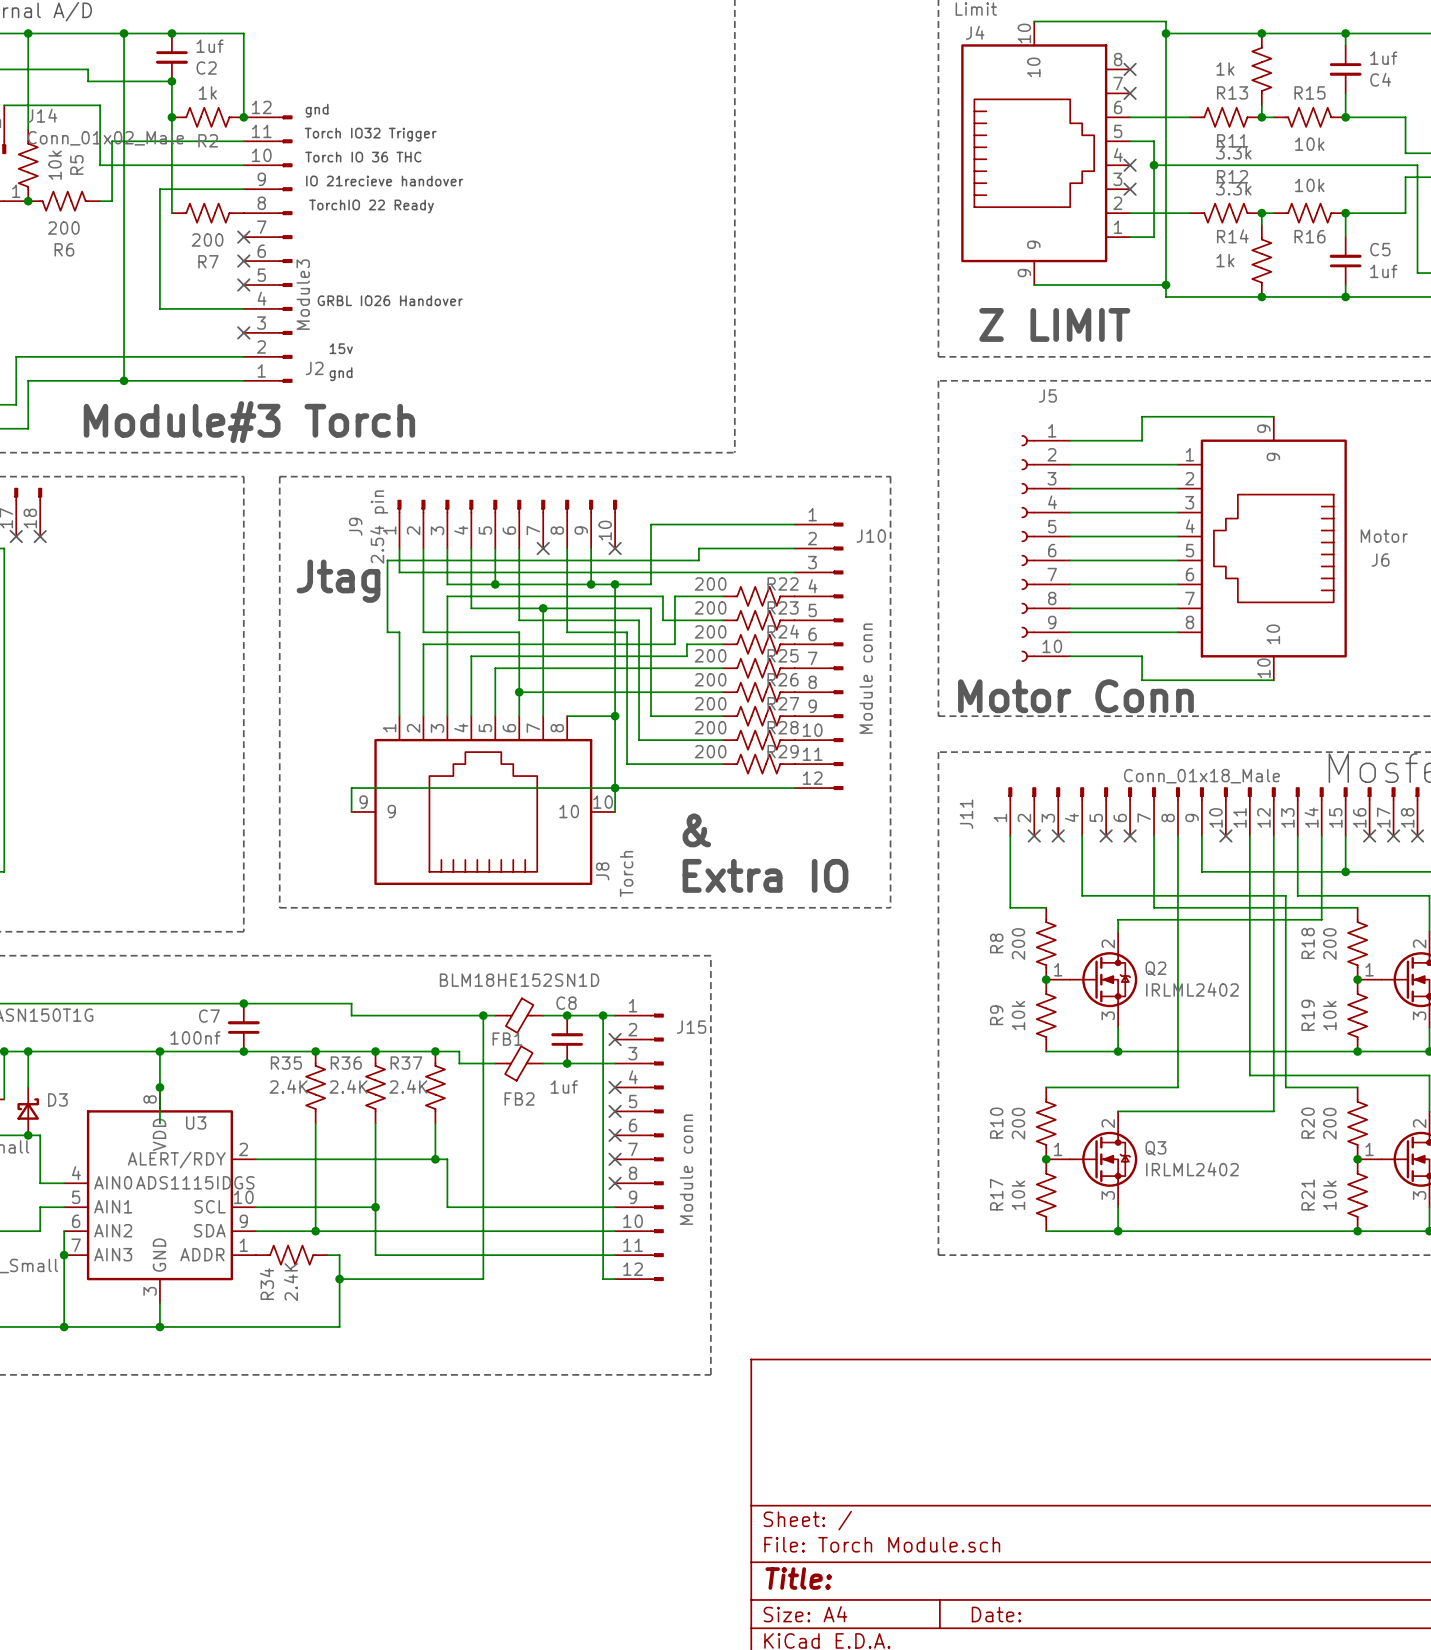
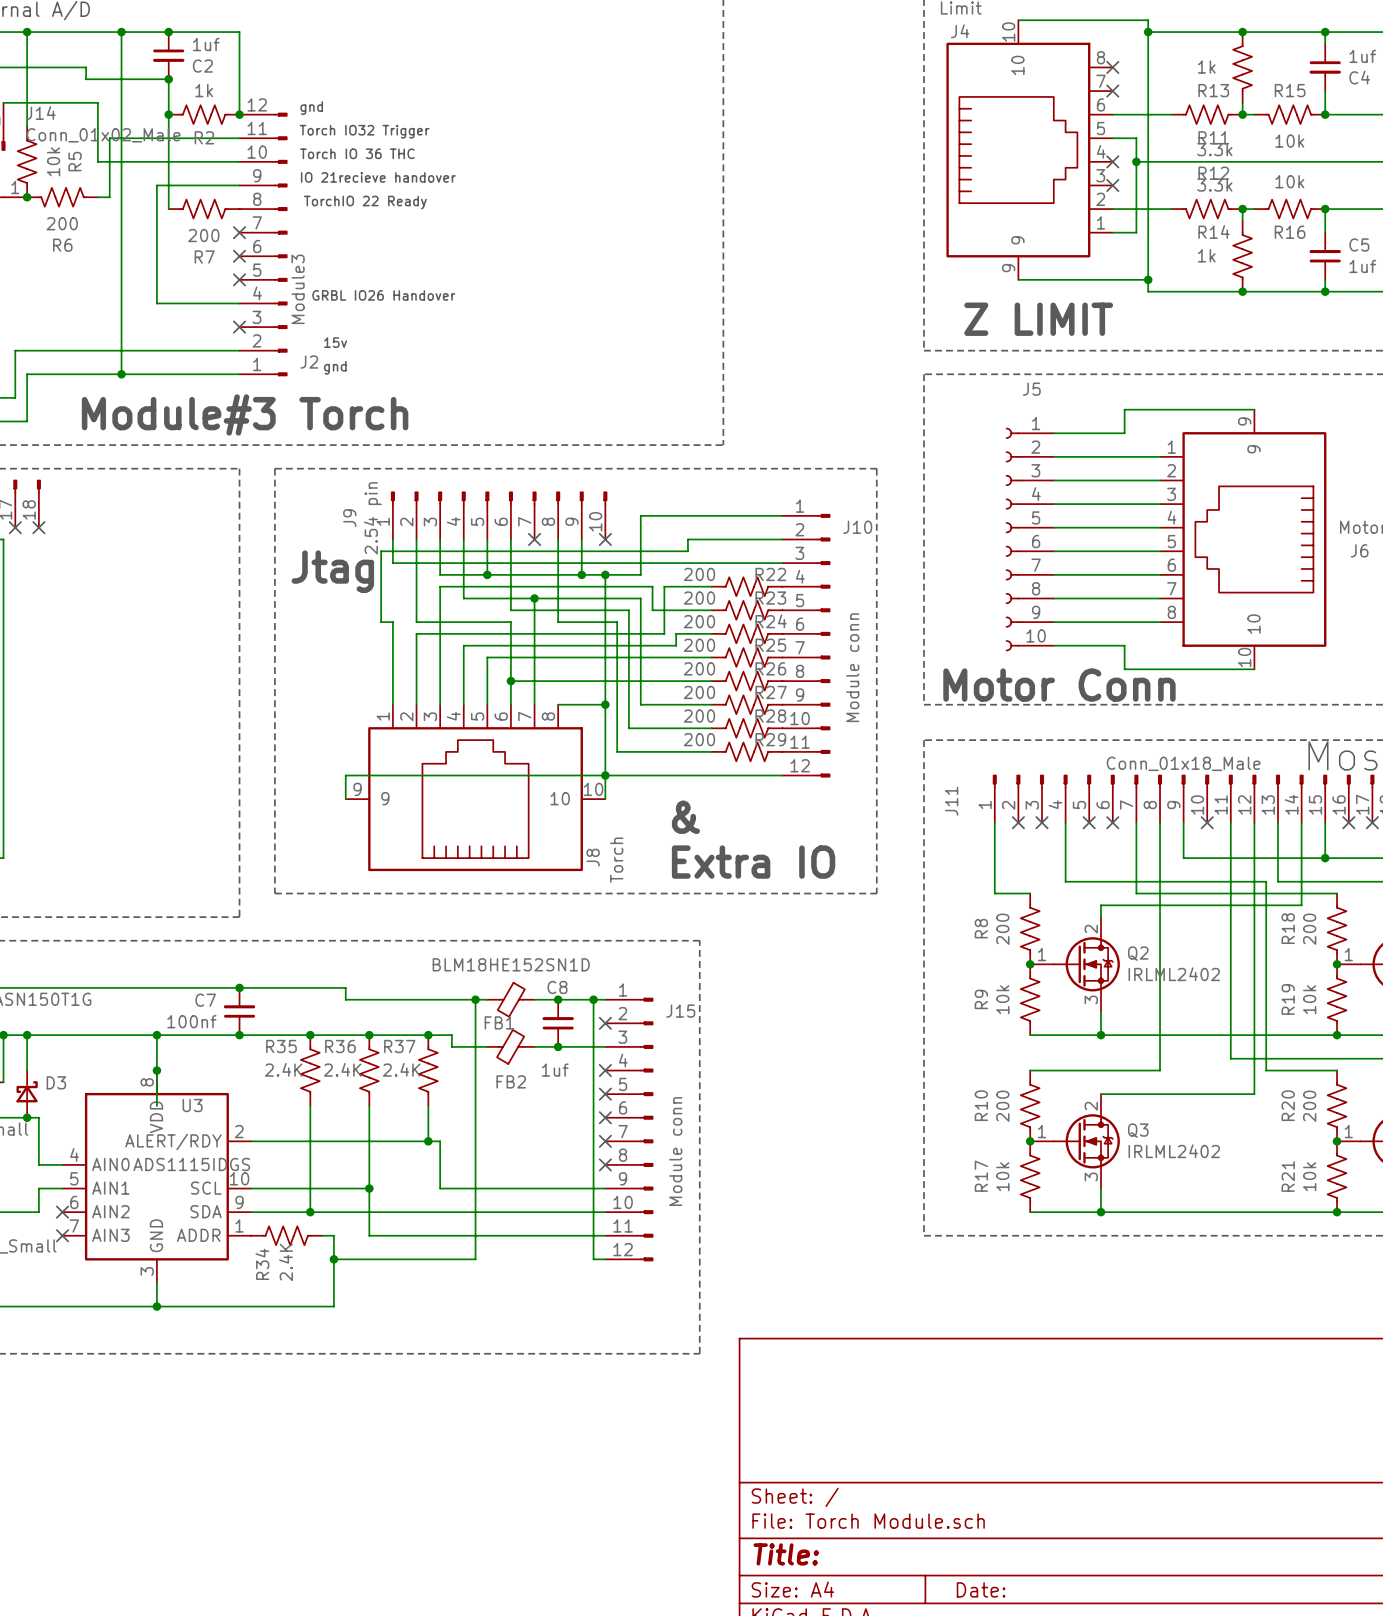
wire: (64, 1231) (64, 1326) -> none
no-connect mark: none -> (62, 1212)
junction: (64, 1255) -> none
no-connect mark: none -> (62, 1235)
junction: (64, 1326) -> none

